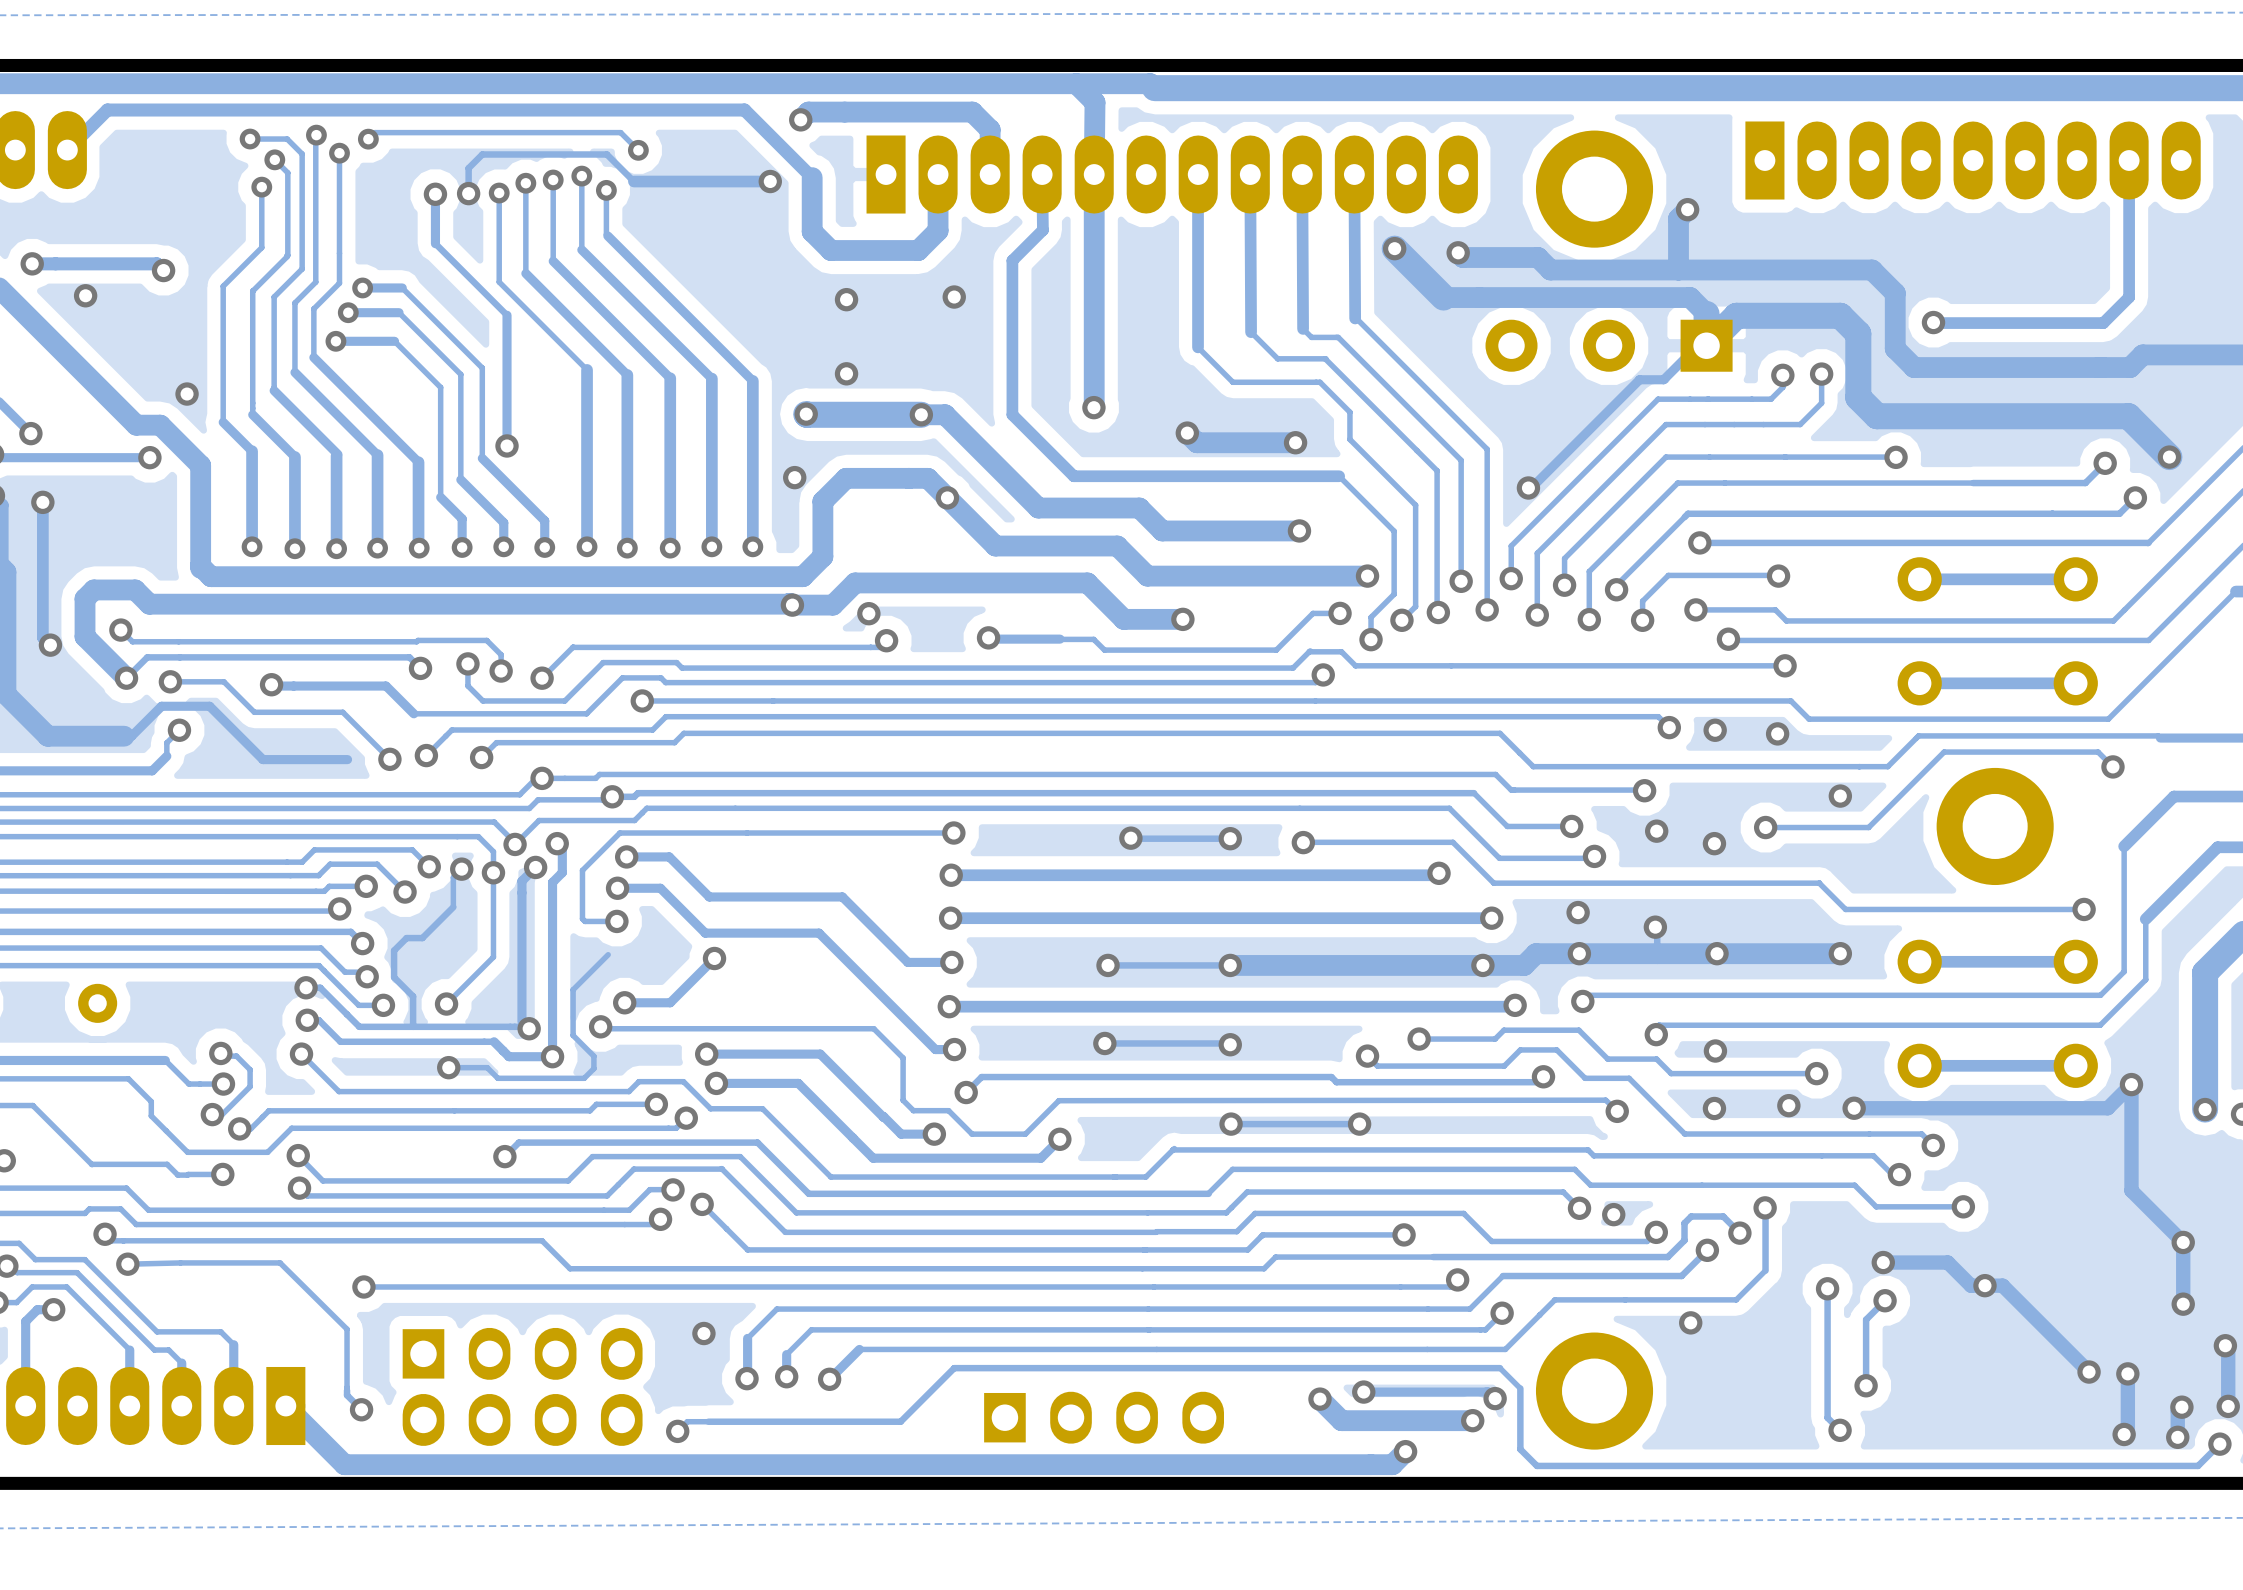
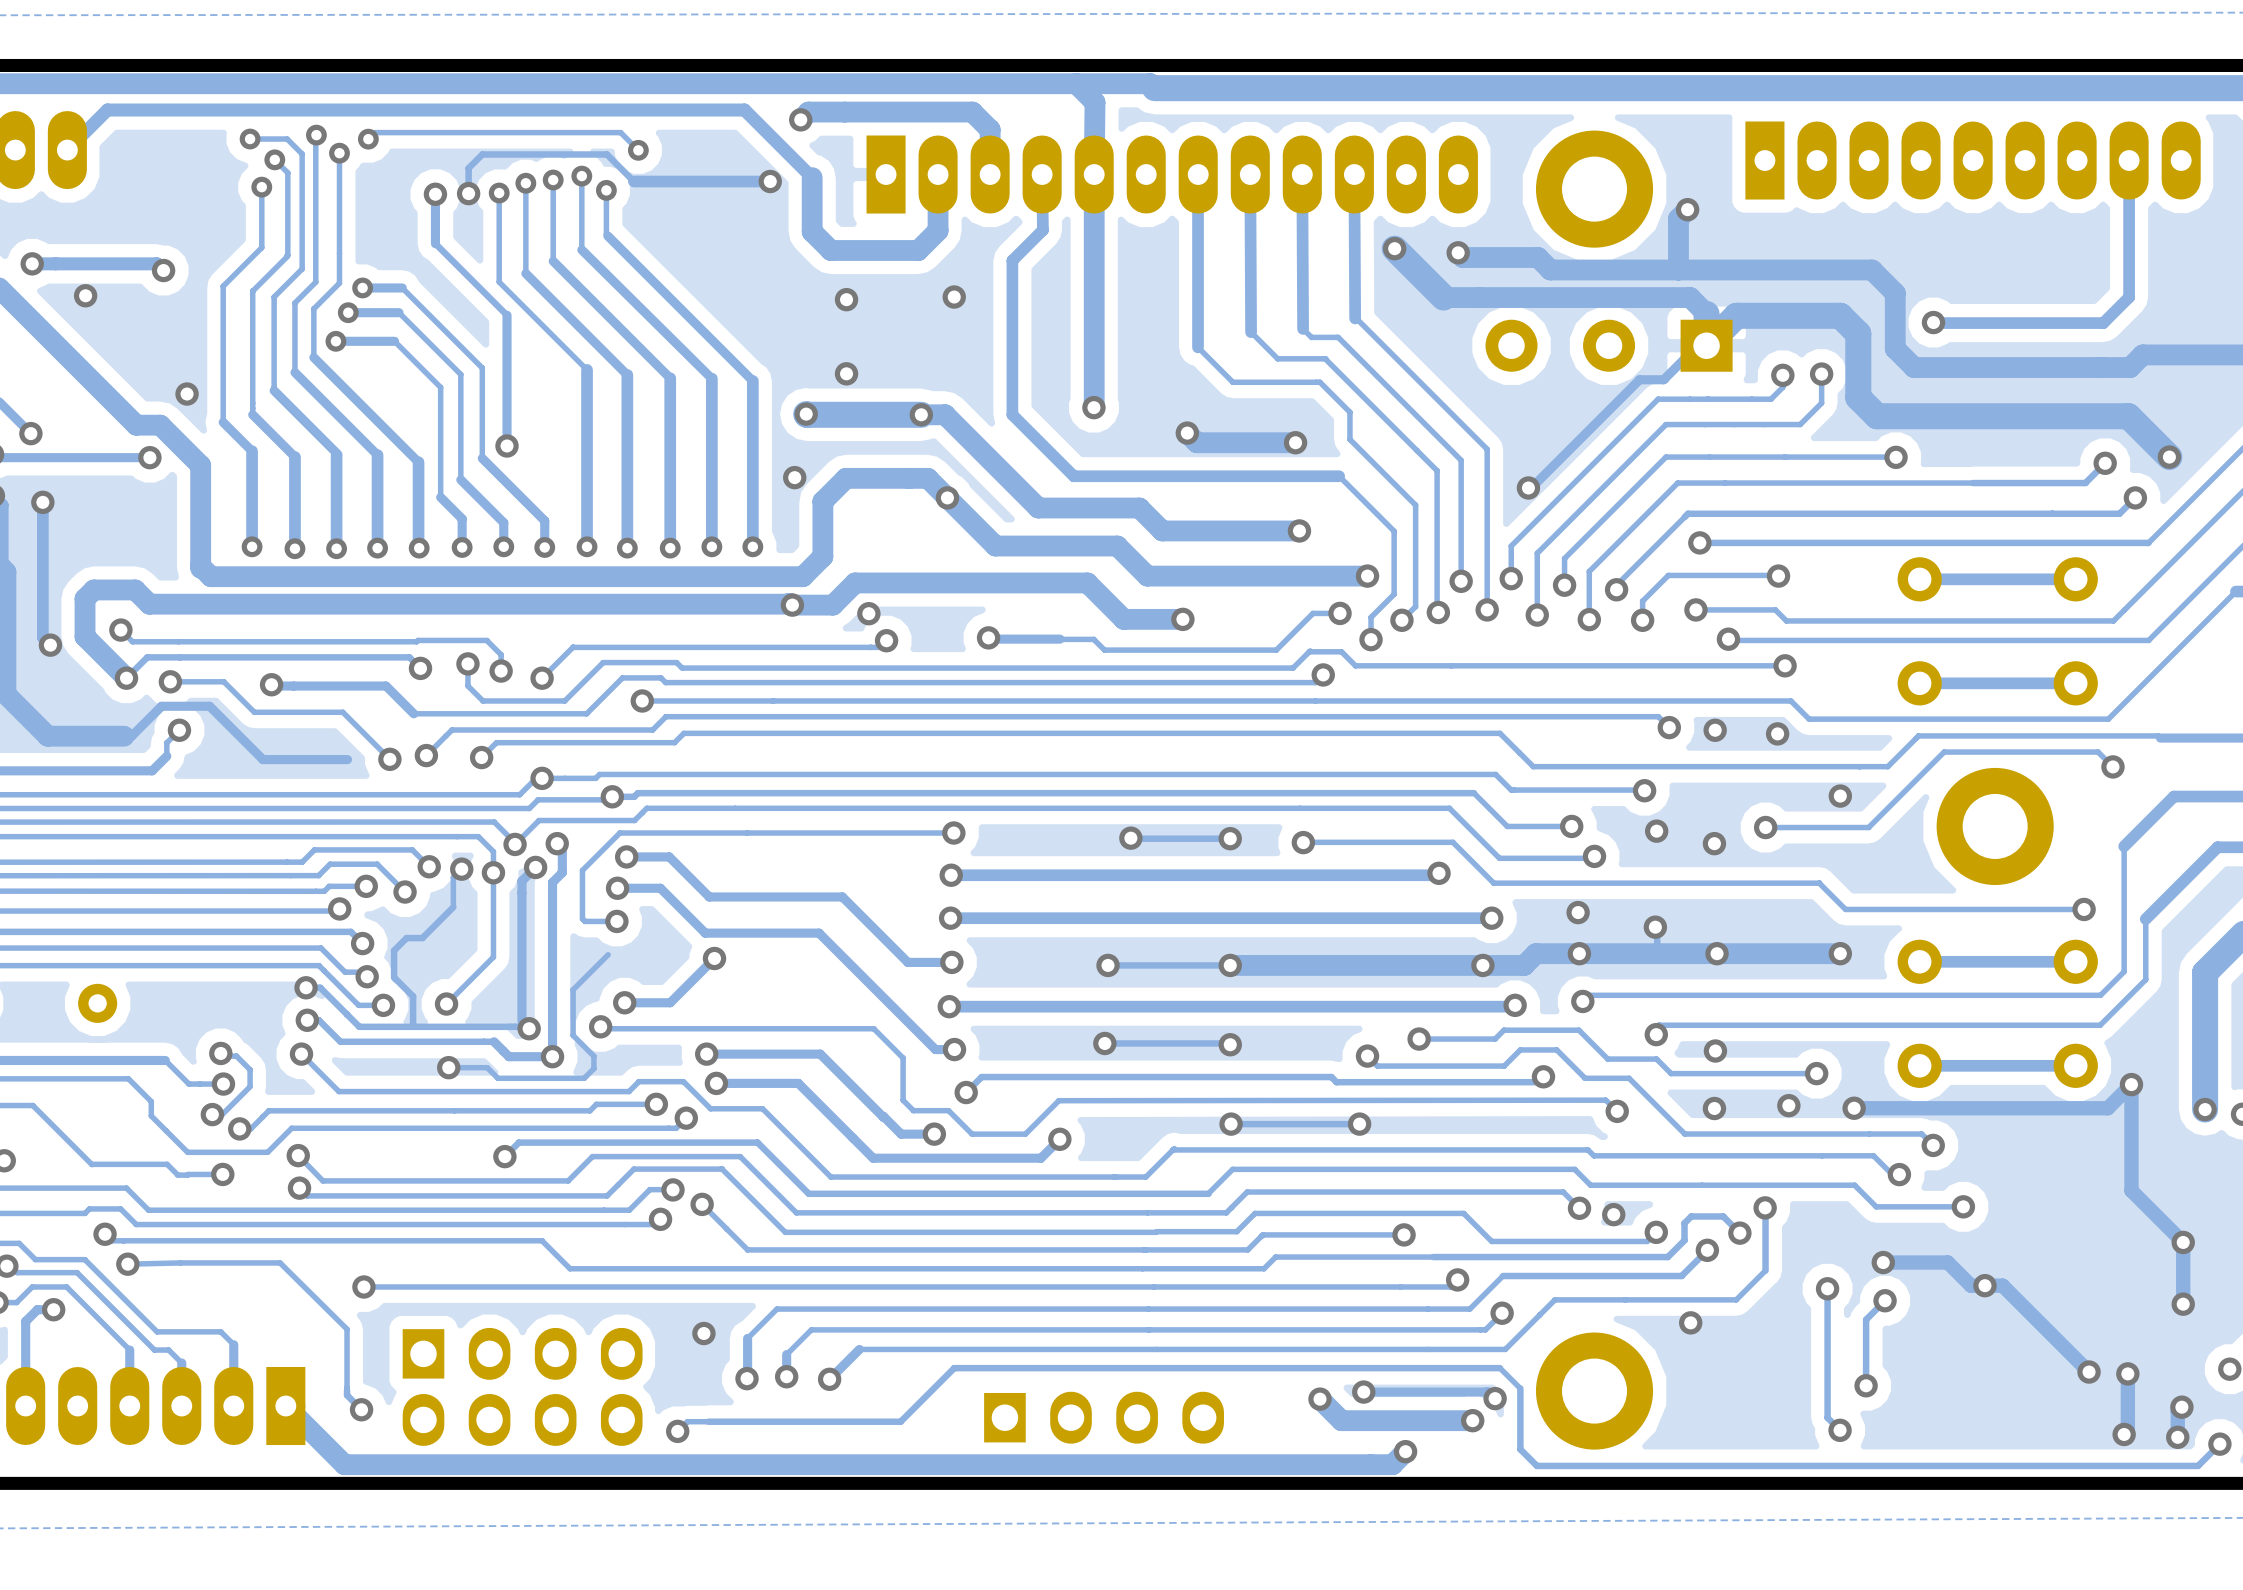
track: (2225, 1345) (2228, 1348) (2228, 1406) -> none
via: (2225, 1345) -> none
via: none -> (2229, 1369)
via: (2228, 1406) -> none

